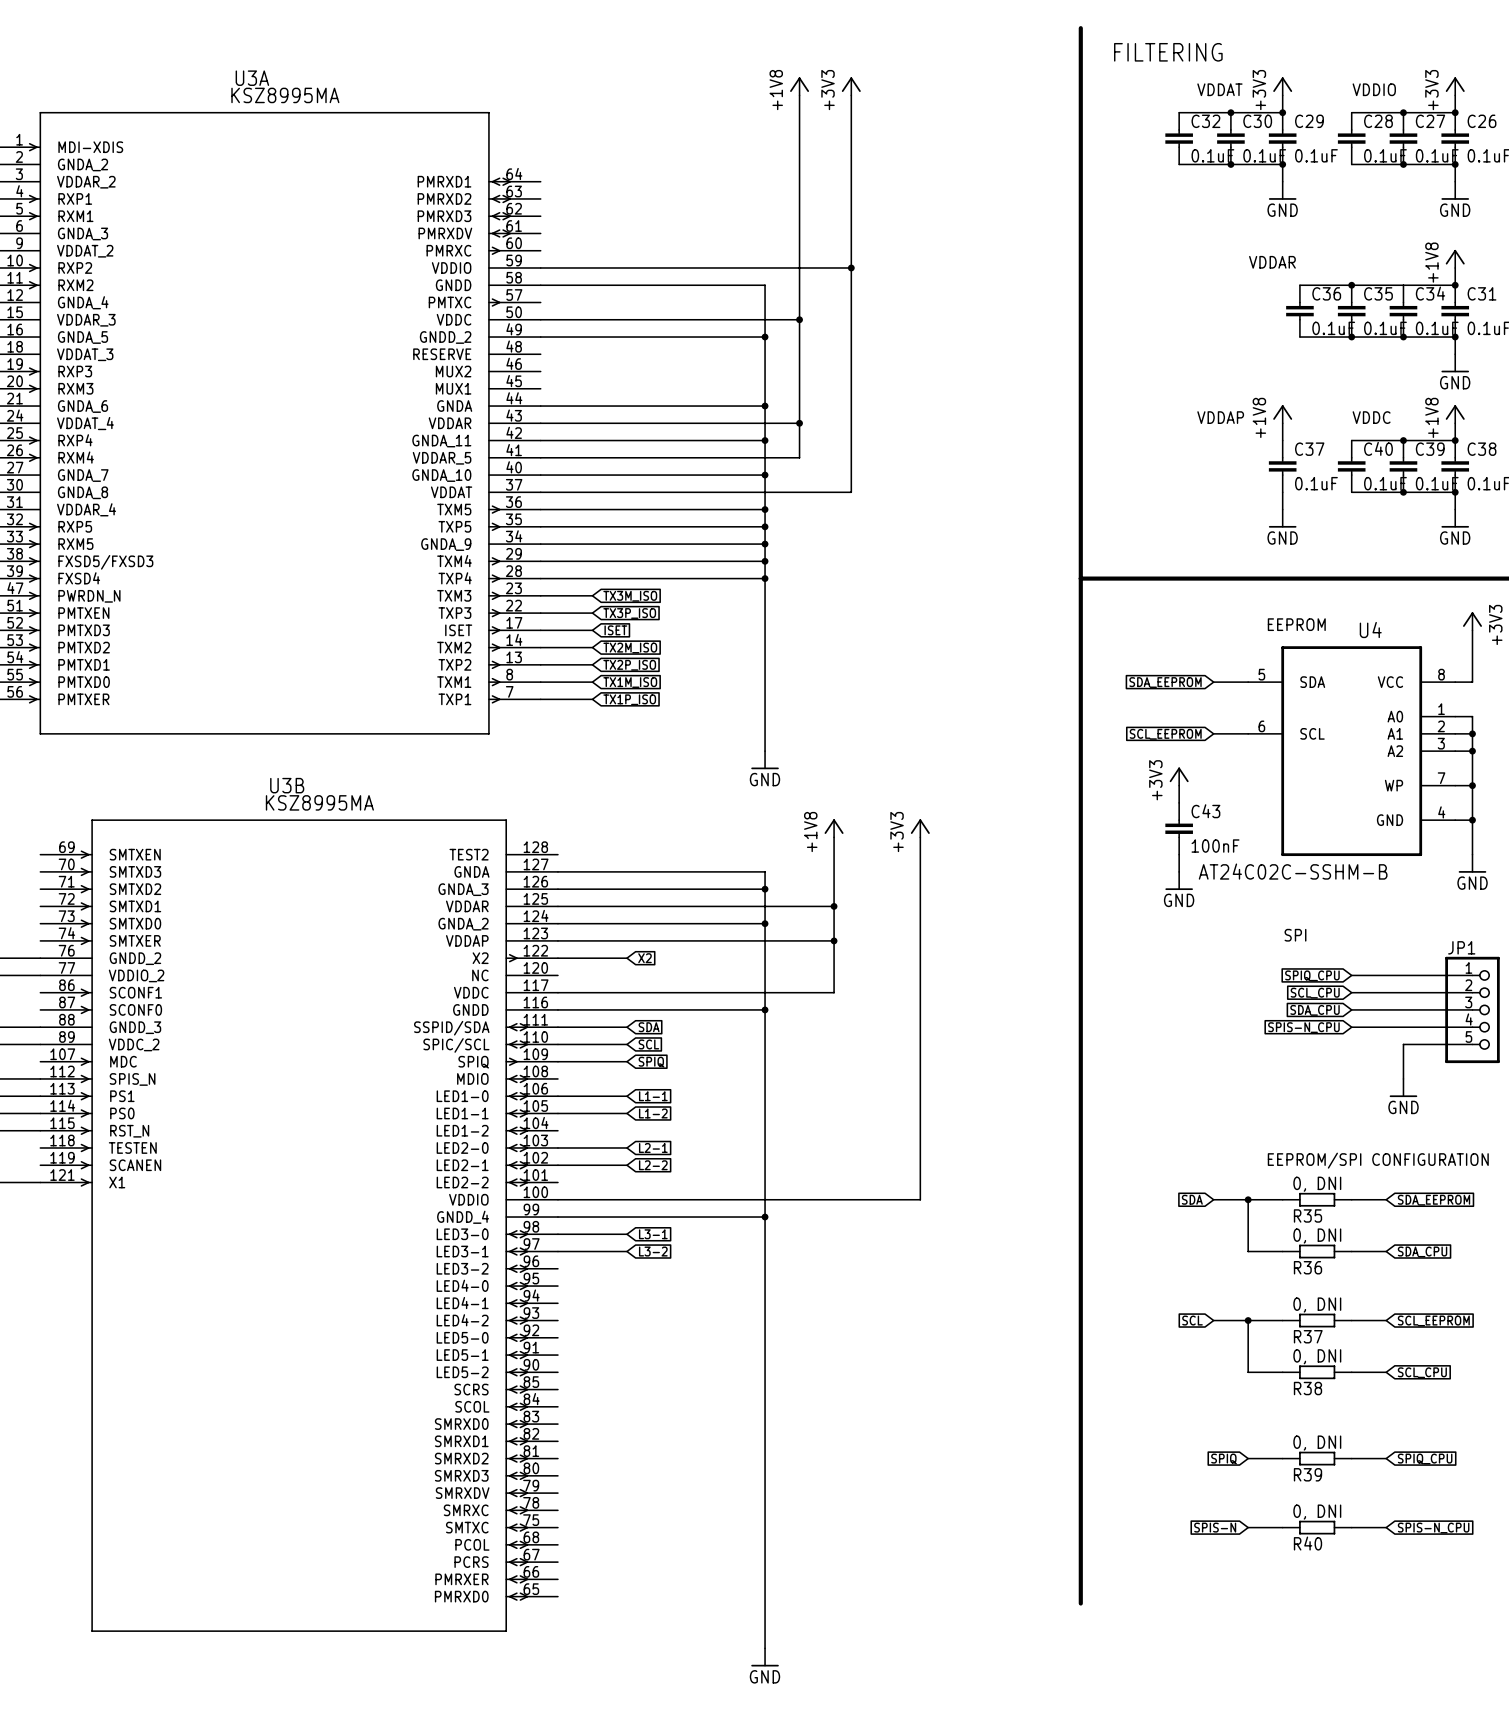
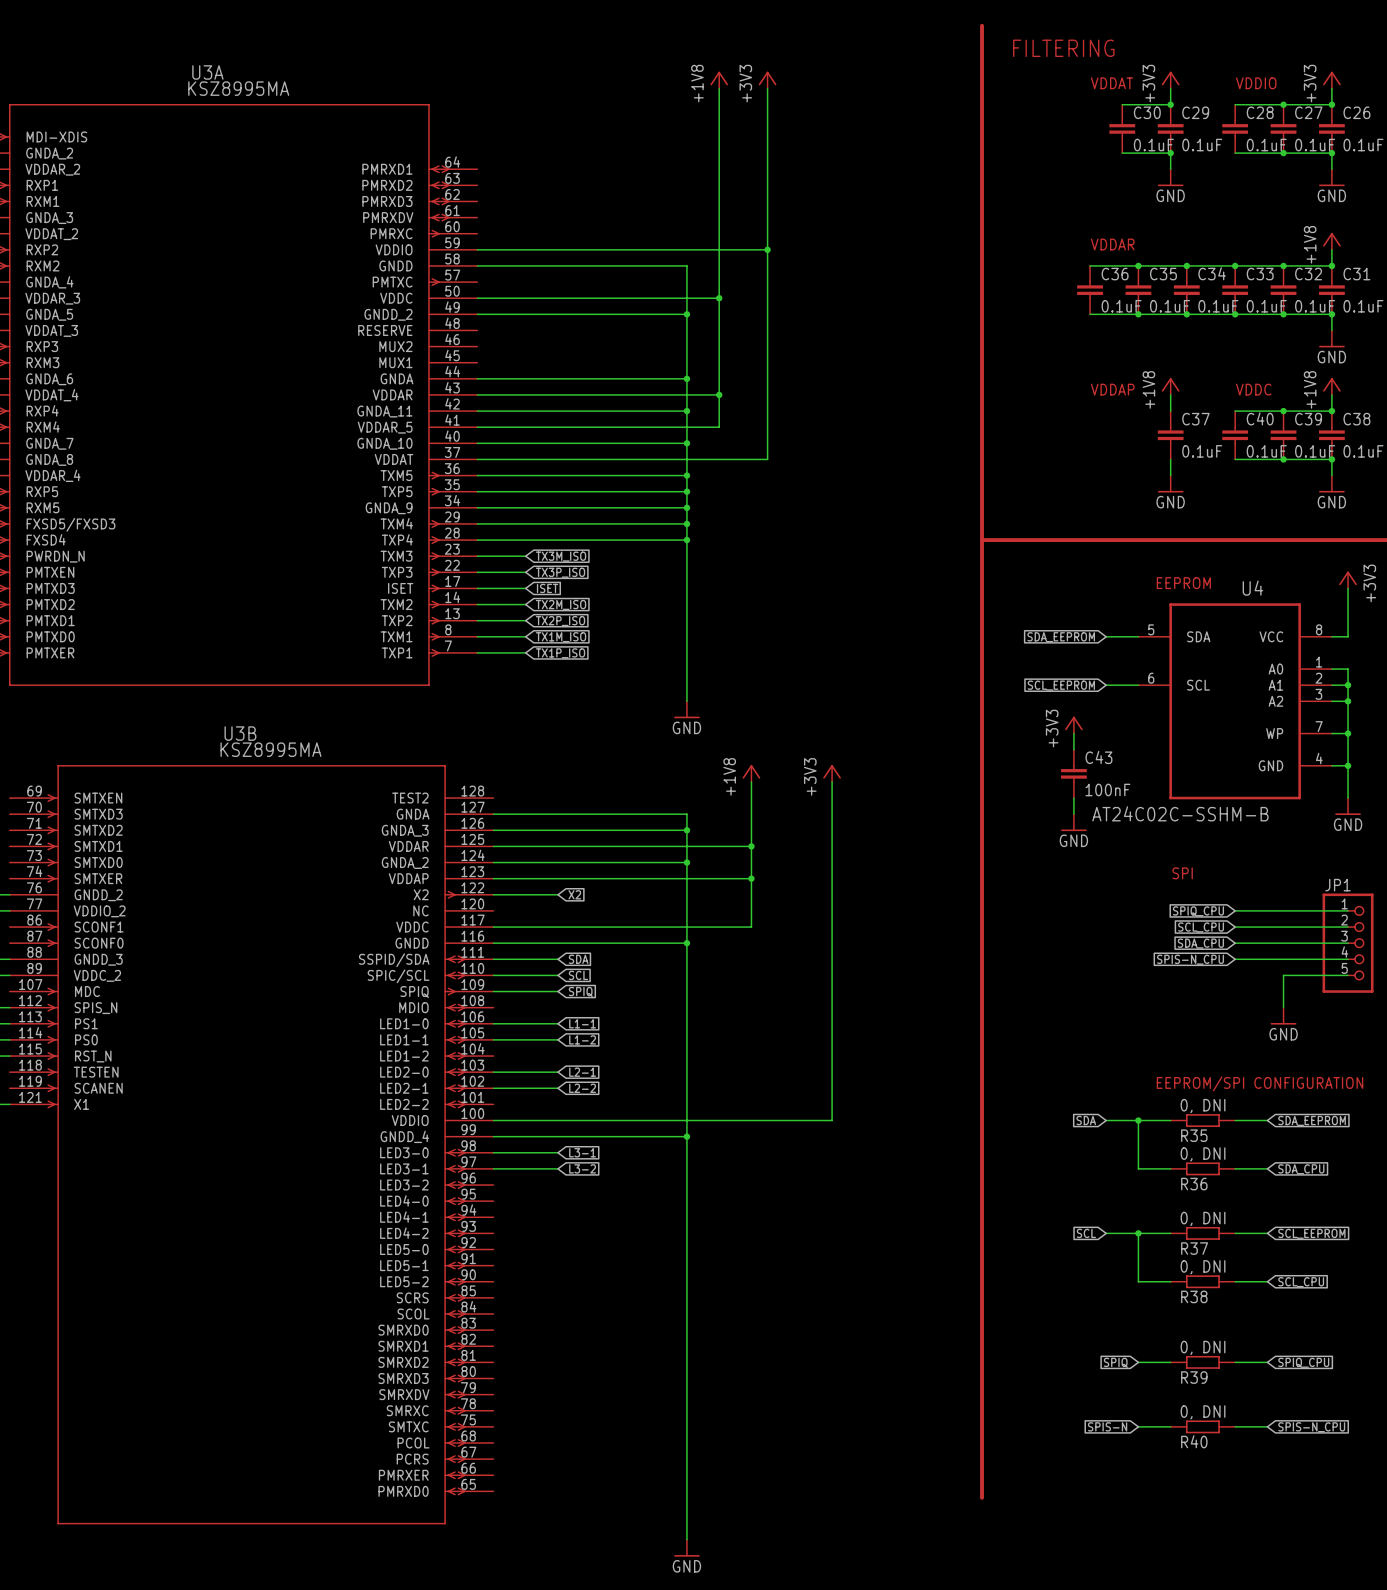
wire: (1179, 112) (1230, 112) -> none
junction: (1230, 112) -> none
C32: 0.1uF (1179, 138) -> none
wire: (1179, 164) (1230, 164) -> none
junction: (1230, 164) -> none
text position: VDDAR (1272, 262) -> VDDAR (1112, 244)
wire: none -> (1090, 265) (1186, 265)
junction: none -> (1138, 265)
junction: none -> (1186, 265)
junction: none -> (1283, 265)
C36 name: C36 (1326, 293) -> C34 (1212, 273)
C35 name: C35 (1378, 293) -> C33 (1260, 274)
C34 name: C34 (1430, 293) -> C32 (1308, 274)
C36: none -> 0.1uF (1090, 290)
C35: none -> 0.1uF (1138, 290)
wire: none -> (1090, 314) (1186, 314)
junction: none -> (1138, 314)
junction: none -> (1186, 314)

